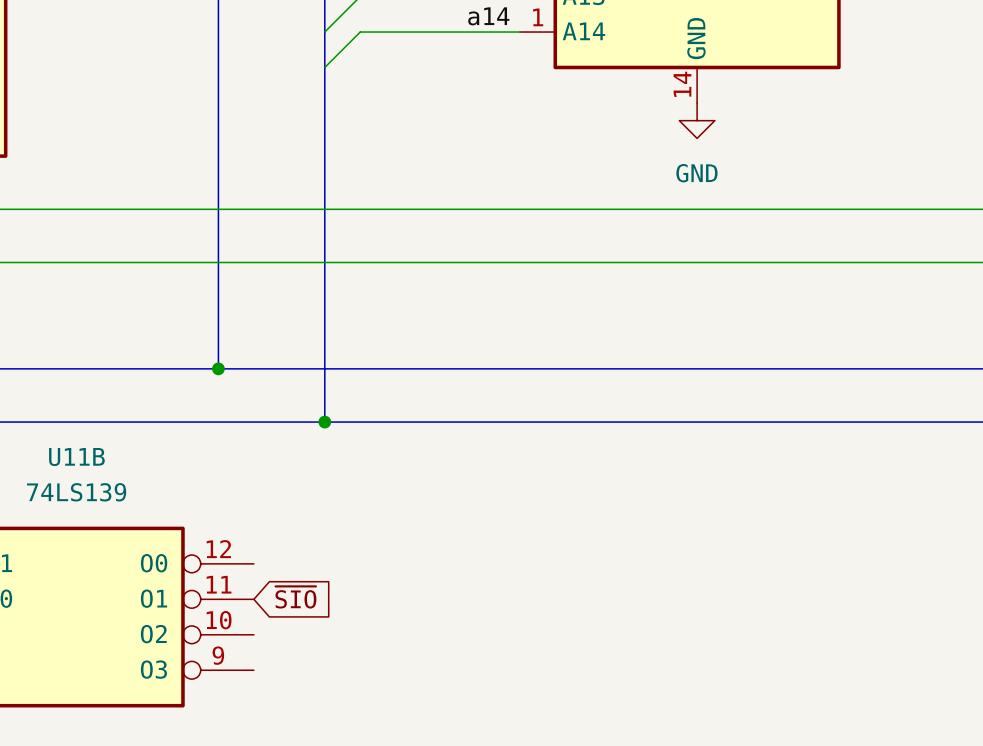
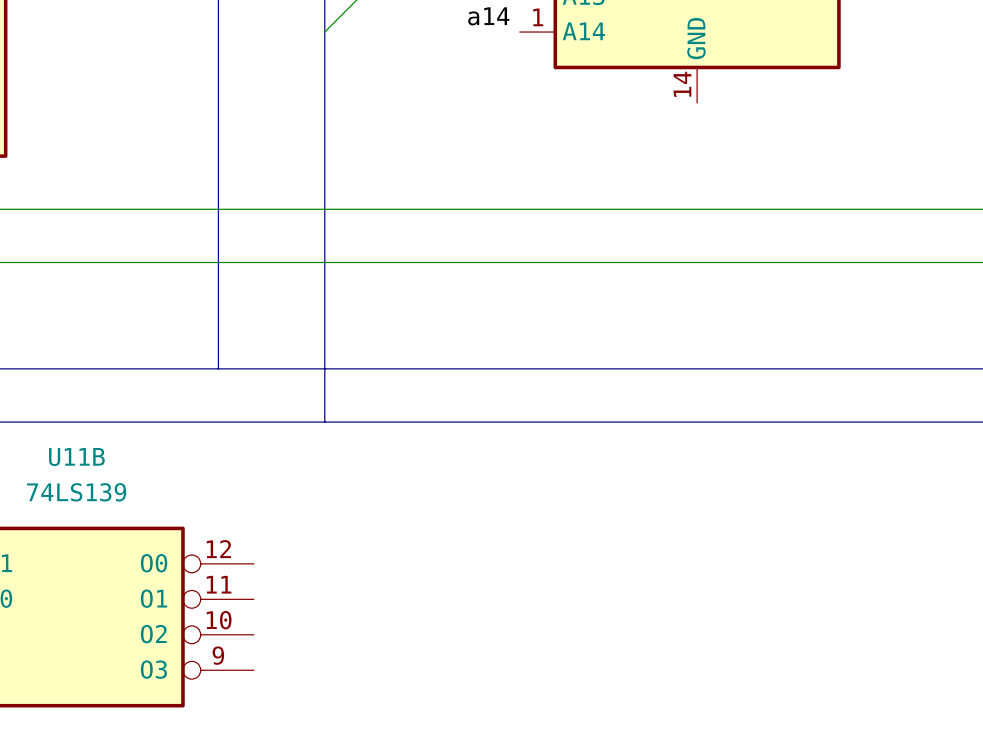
wire: (519, 32) (360, 32) (324, 67) -> none
power symbol: GND (697, 120) -> none
junction: (218, 368) -> none
junction: (324, 422) -> none
global label: ~{SIO} (295, 597) -> none

